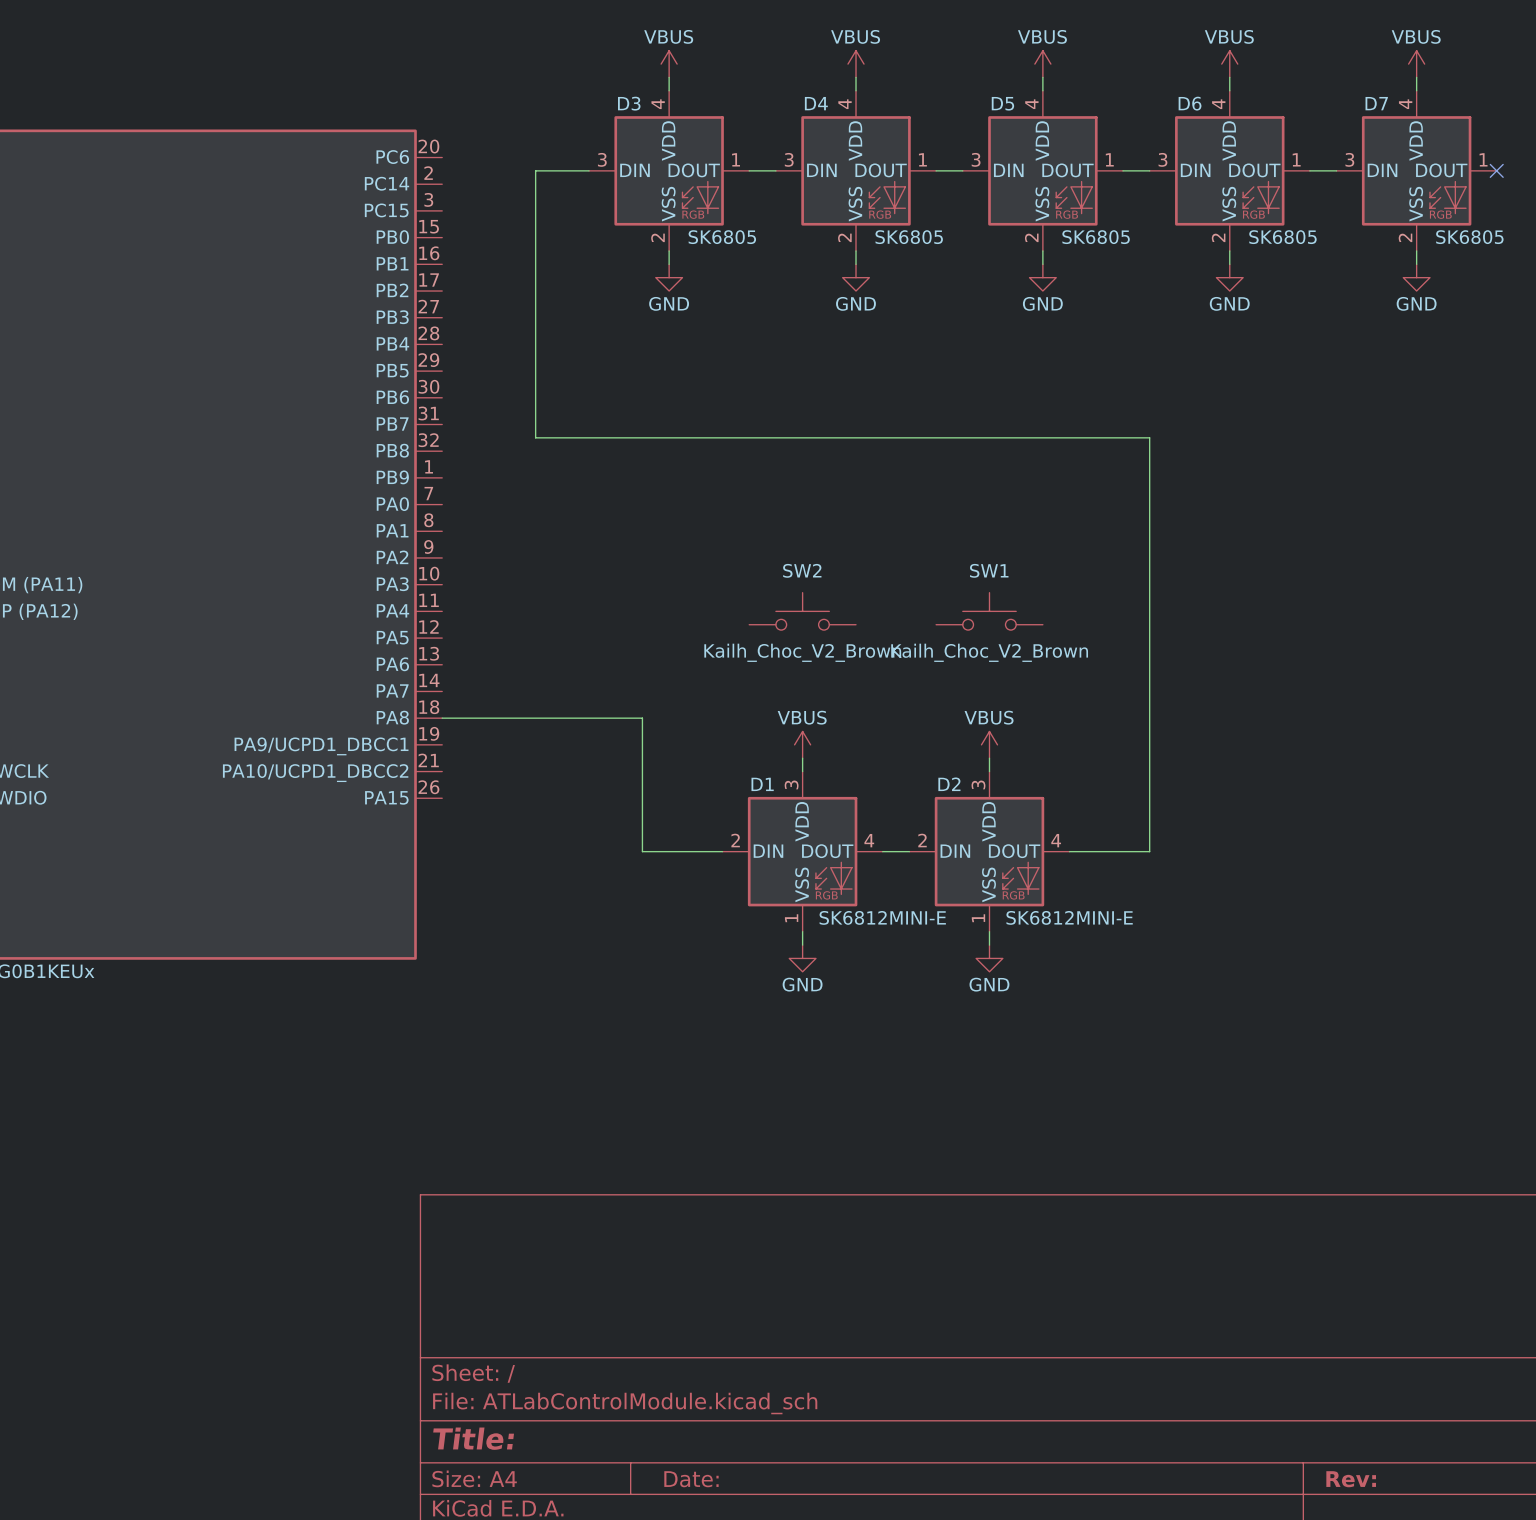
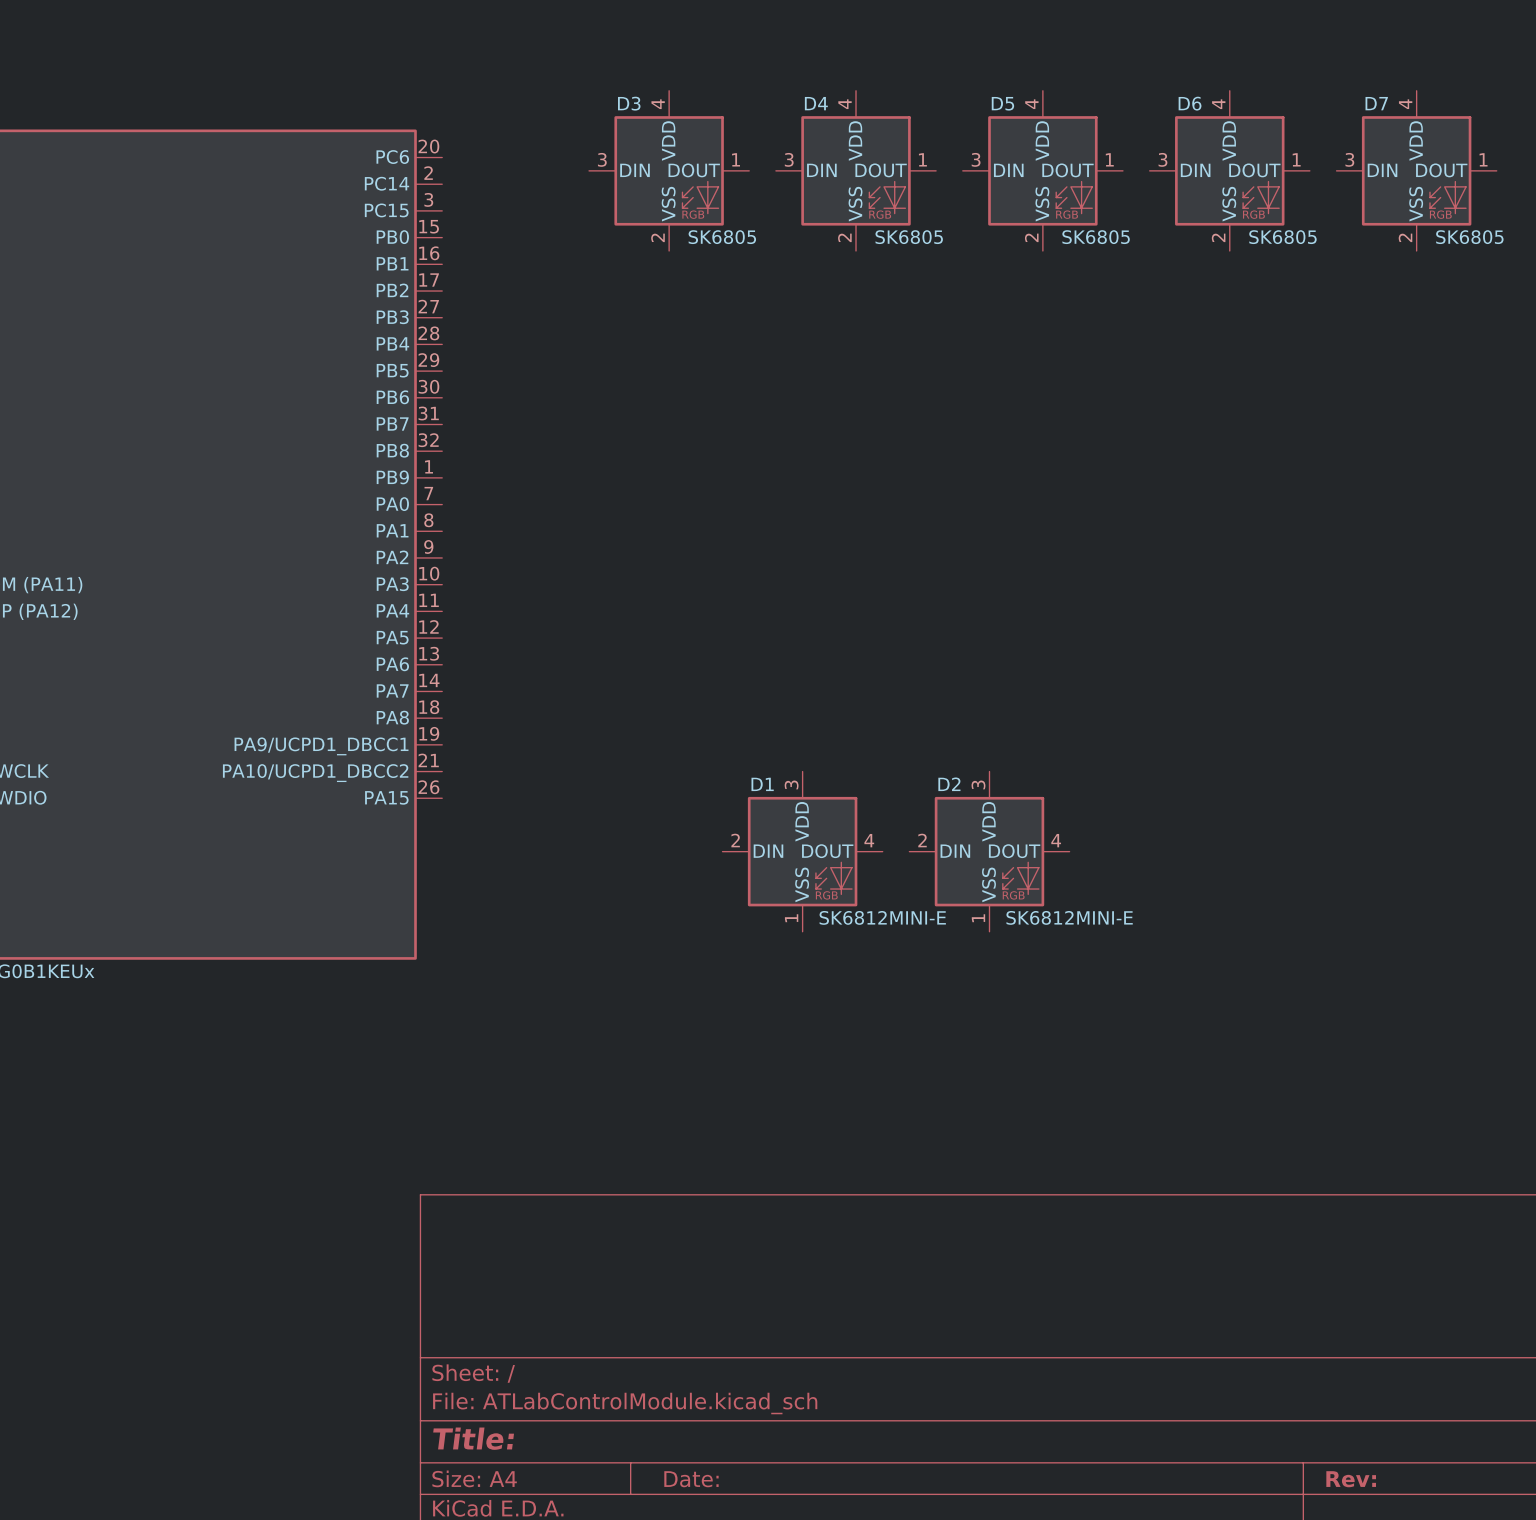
power symbol: VBUS (669, 64) -> none
power symbol: VBUS (856, 64) -> none
power symbol: VBUS (1042, 64) -> none
power symbol: VBUS (1229, 64) -> none
power symbol: VBUS (1416, 64) -> none
wire: (669, 77) (669, 90) -> none
wire: (856, 77) (856, 90) -> none
wire: (1042, 77) (1042, 90) -> none
wire: (1229, 77) (1229, 90) -> none
wire: (1416, 77) (1416, 90) -> none
wire: (589, 170) (535, 170) (535, 437) (1149, 437) (1149, 851) (1069, 851) -> none
wire: (749, 170) (775, 170) -> none
wire: (936, 170) (962, 170) -> none
wire: (1122, 170) (1149, 170) -> none
wire: (1309, 170) (1336, 170) -> none
no-connect mark: (1496, 170) -> none
wire: (669, 250) (669, 264) -> none
wire: (856, 250) (856, 264) -> none
wire: (1042, 250) (1042, 264) -> none
wire: (1229, 250) (1229, 264) -> none
wire: (1416, 250) (1416, 264) -> none
power symbol: GND (669, 277) -> none
power symbol: GND (856, 277) -> none
power symbol: GND (1042, 277) -> none
power symbol: GND (1229, 277) -> none
power symbol: GND (1416, 277) -> none
SW2: Kailh_Choc_V2_Brown (802, 611) -> none
SW1: Kailh_Choc_V2_Brown (989, 611) -> none
wire: (442, 718) (642, 718) (642, 851) (722, 851) -> none
power symbol: VBUS (802, 744) -> none
power symbol: VBUS (989, 744) -> none
wire: (802, 758) (802, 771) -> none
wire: (989, 758) (989, 771) -> none
wire: (882, 851) (909, 851) -> none
wire: (802, 931) (802, 945) -> none
wire: (989, 931) (989, 945) -> none
power symbol: GND (802, 958) -> none
power symbol: GND (989, 958) -> none

